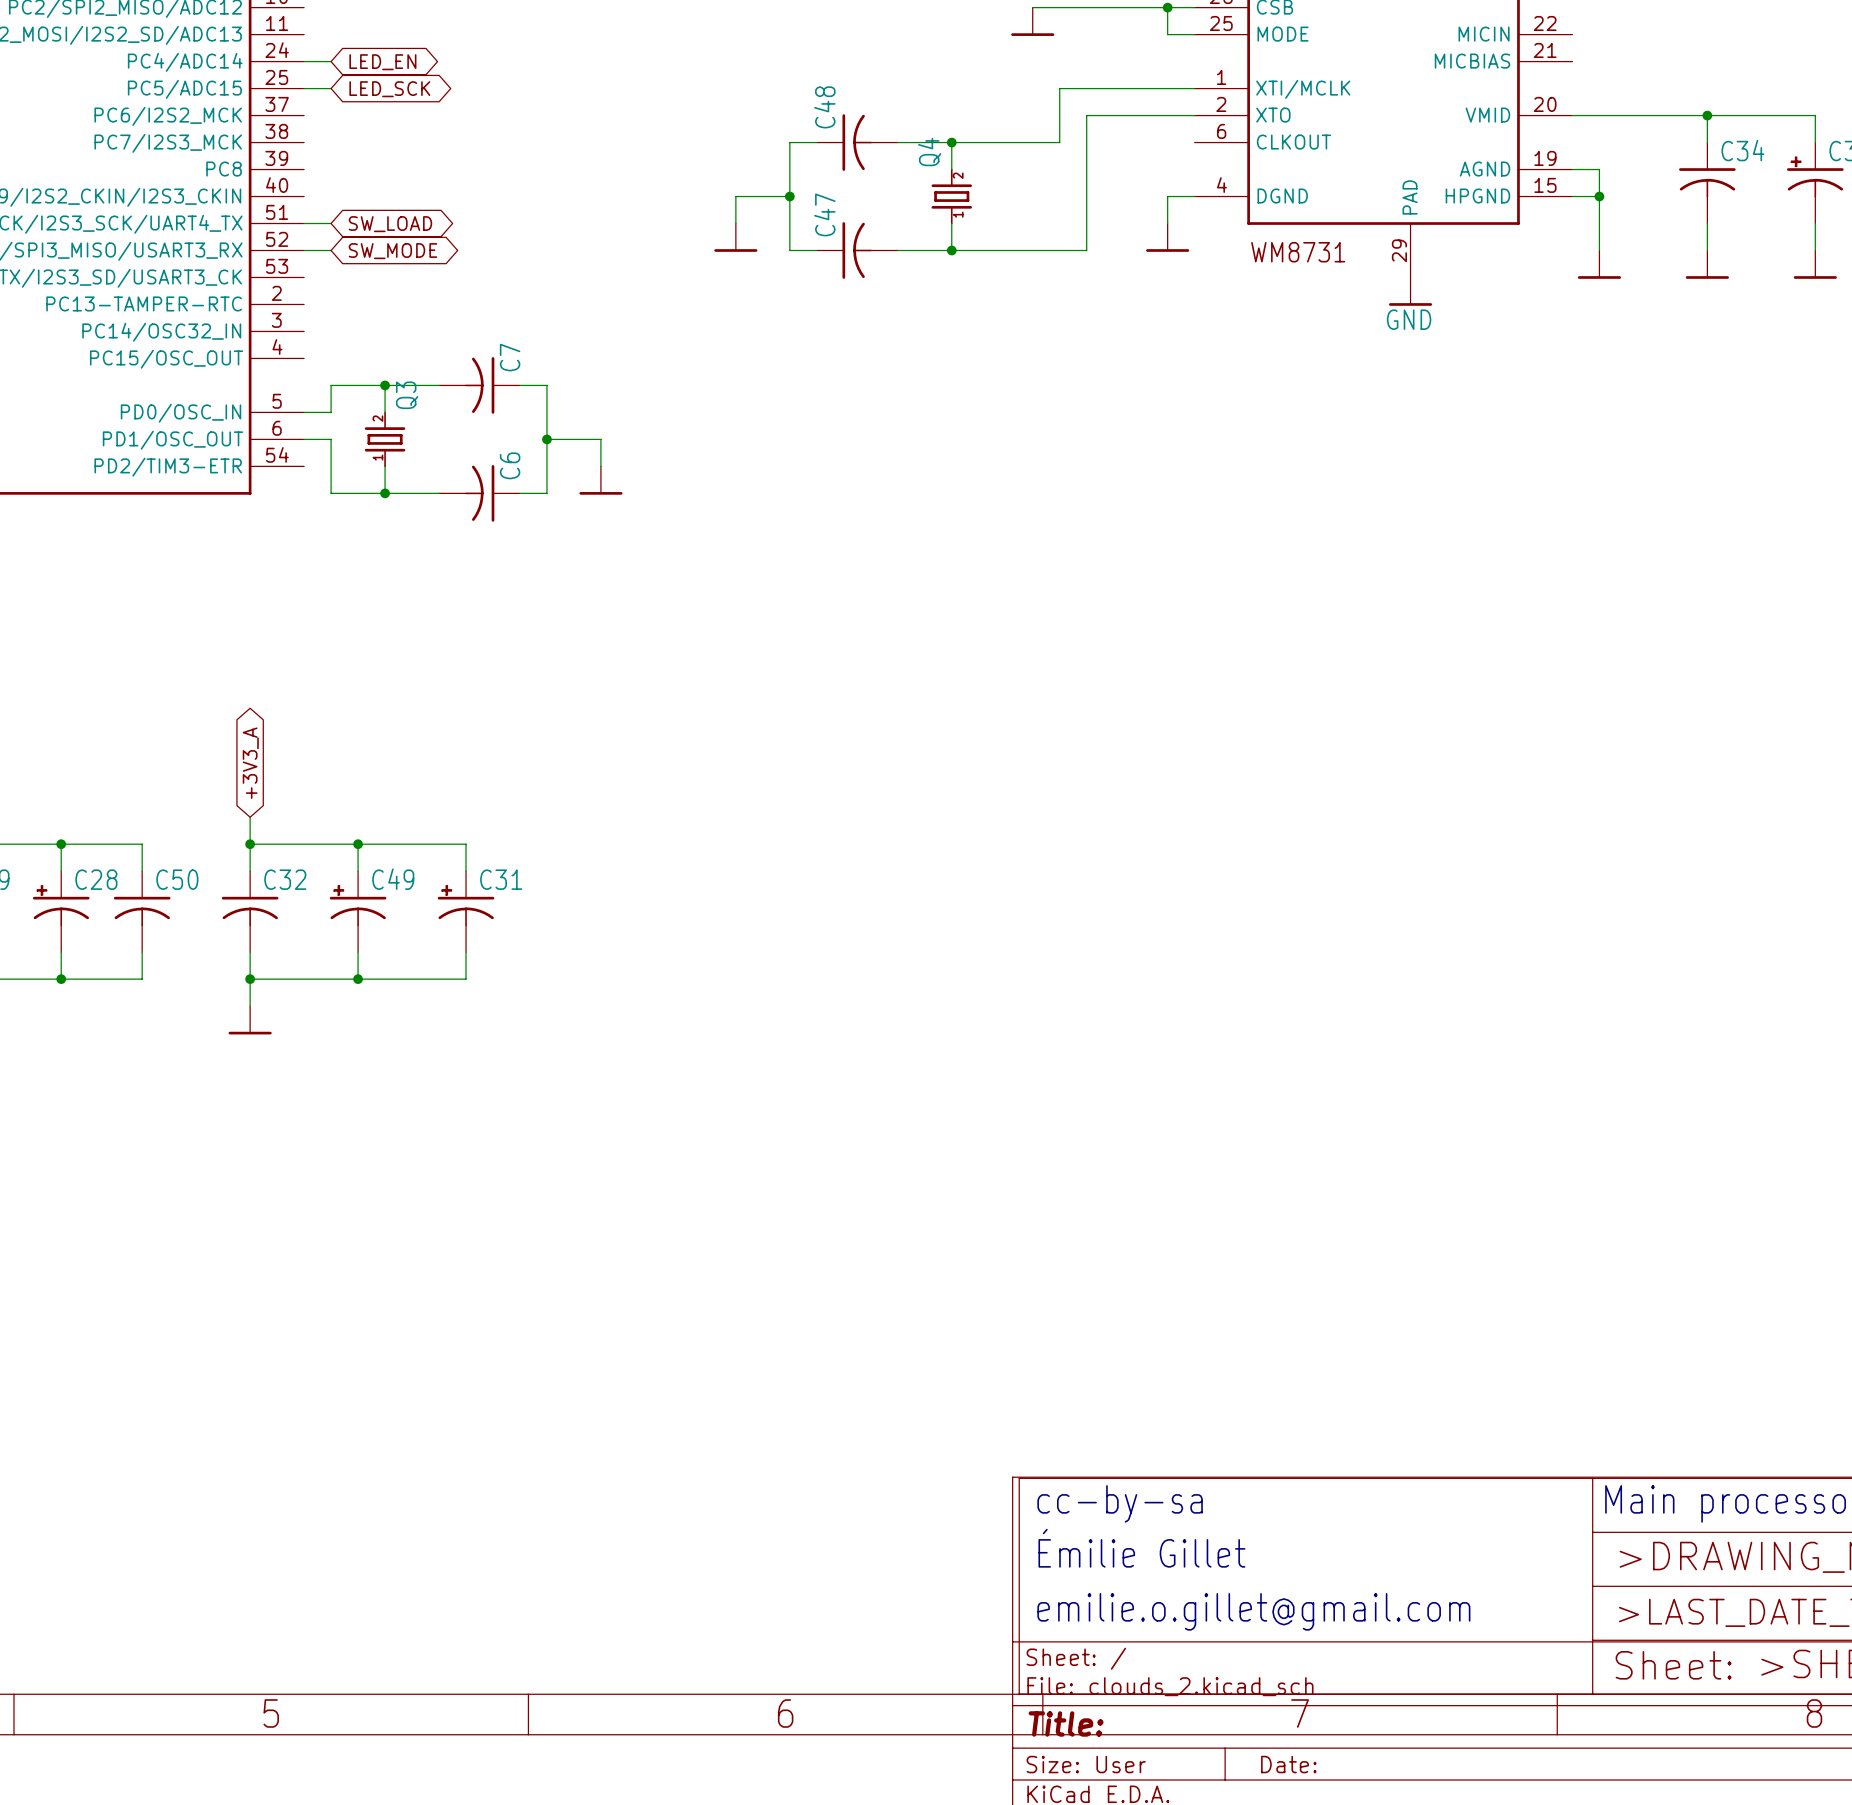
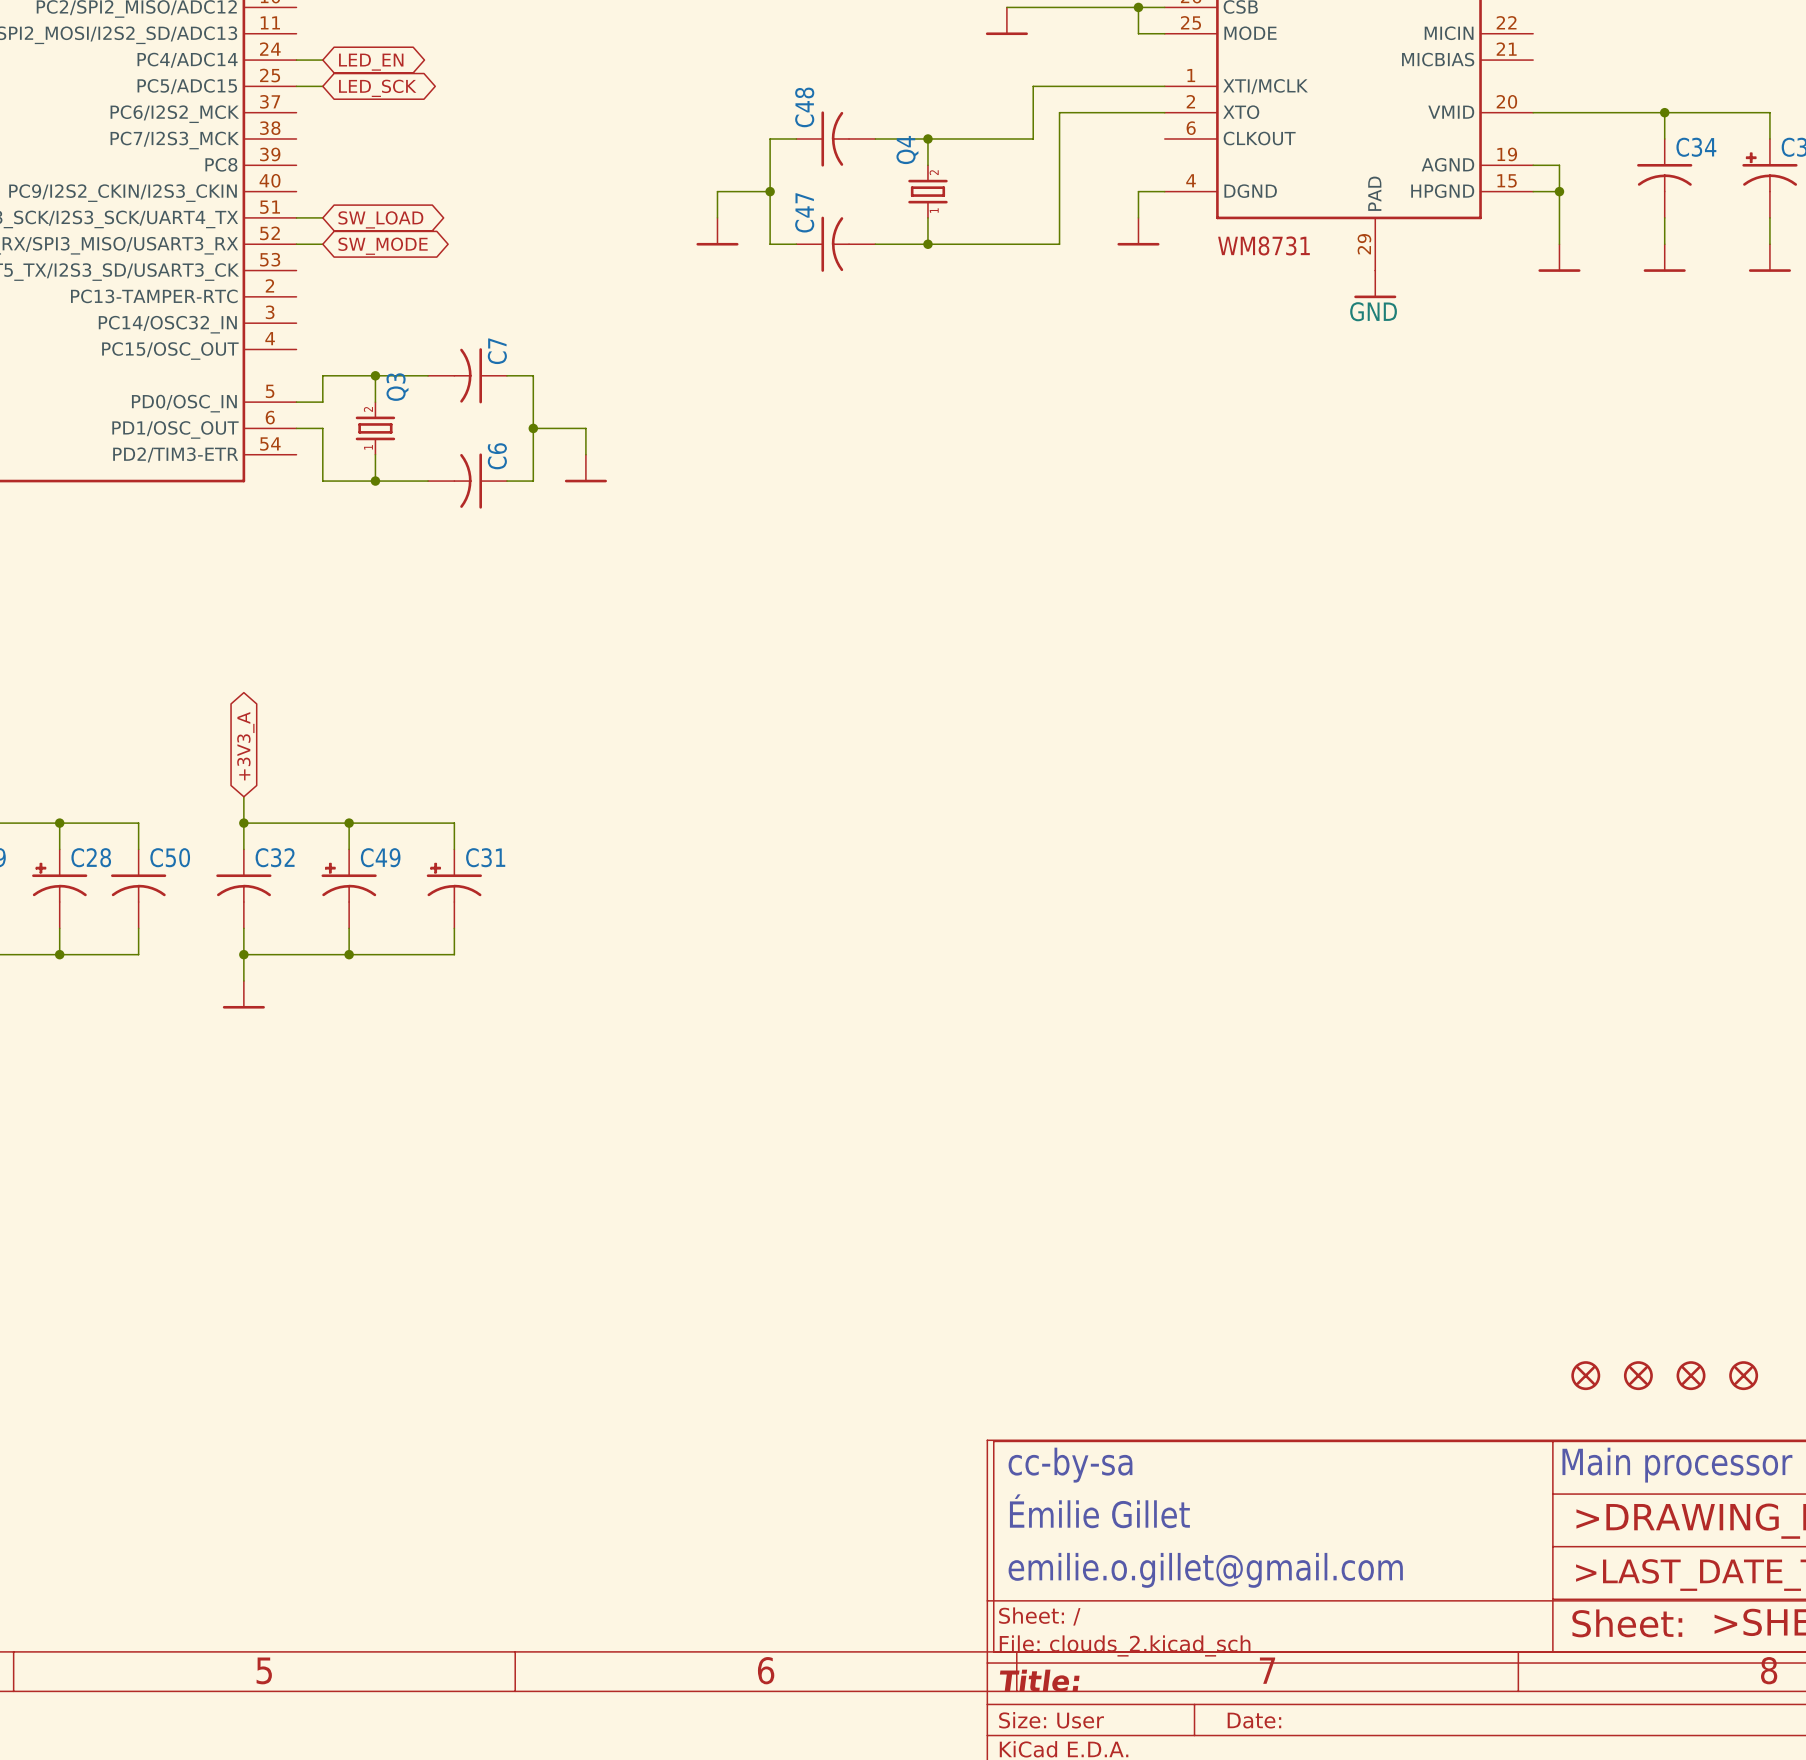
part: none -> (1585, 1375)
part: none -> (1638, 1375)
part: none -> (1691, 1375)
part: none -> (1743, 1375)

